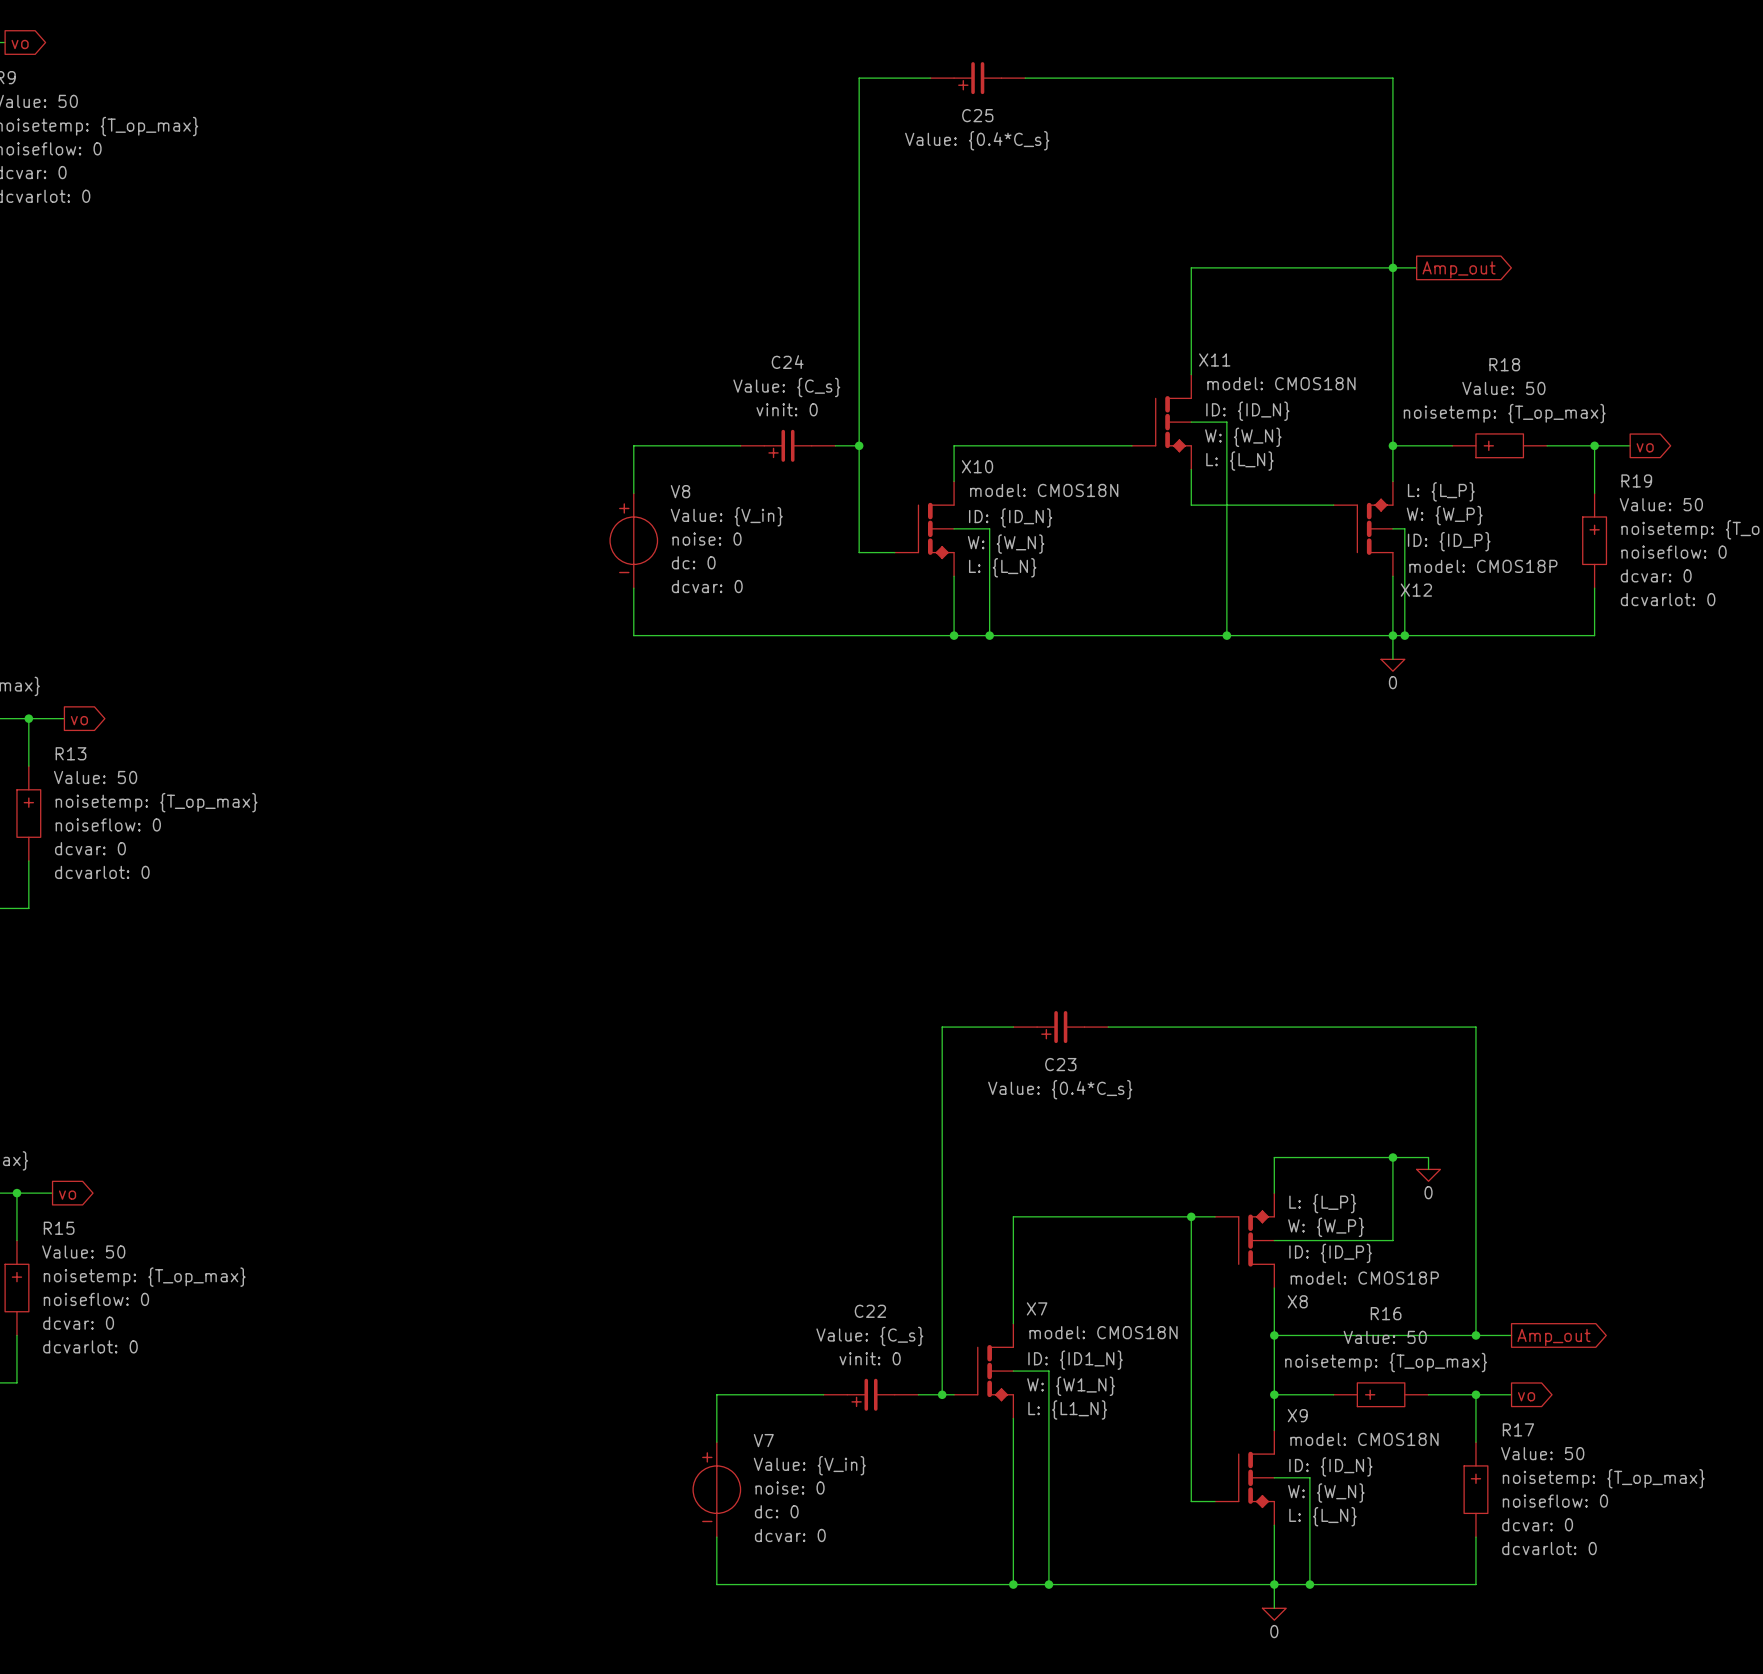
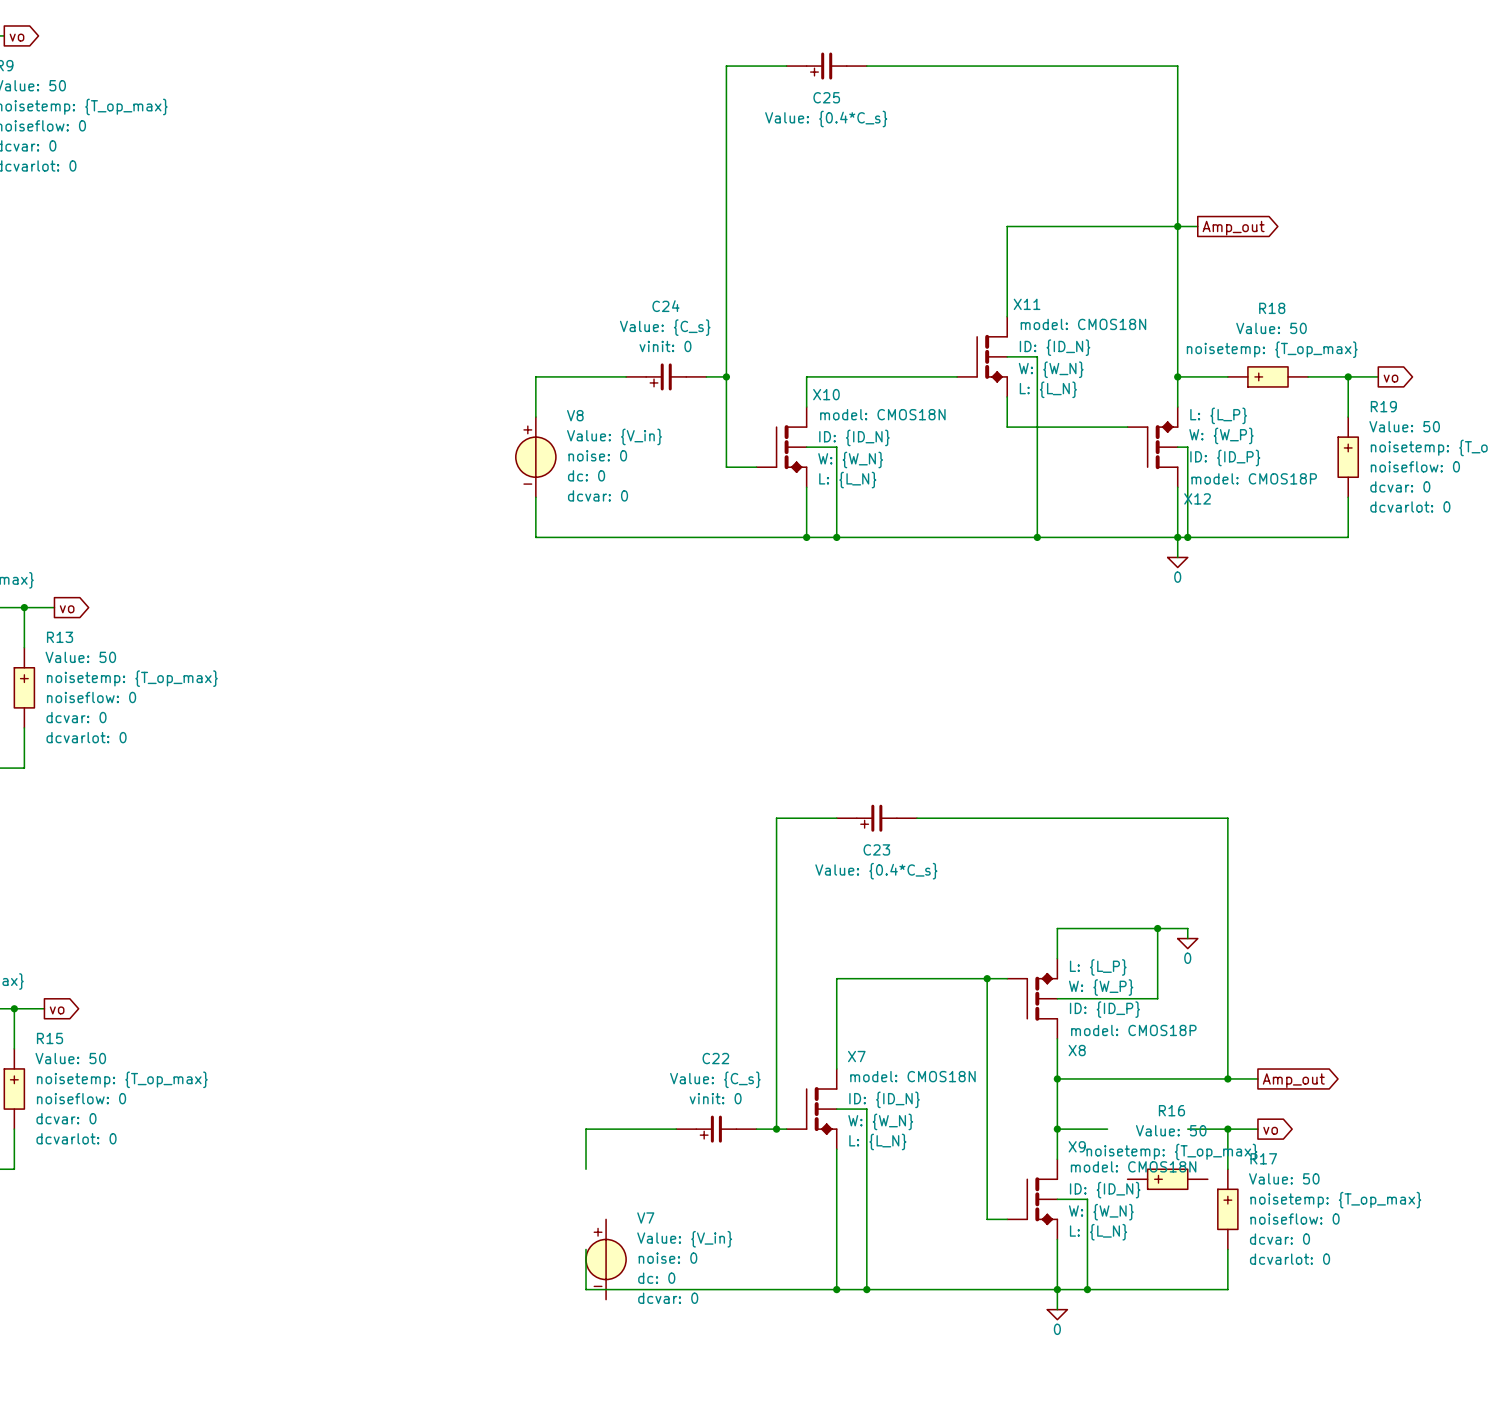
wire: (1013, 1027) (942, 1027) (942, 1394) -> (836, 818) (776, 818) (776, 1129)
C23 position: (1060, 1027) -> (876, 818)
wire: (1108, 1027) (1475, 1027) (1475, 1335) -> (916, 818) (1227, 818) (1227, 1078)
junction: none -> (1157, 928)
junction: none -> (987, 978)
wire: (1392, 1157) (1392, 1240) (1274, 1240) -> (1157, 928) (1157, 998) (1057, 998)
junction: (1392, 1157) -> none
wire: (1428, 1169) (1428, 1157) (1274, 1157) (1274, 1193) -> (1187, 938) (1187, 928) (1057, 928) (1057, 958)
power symbol position: 0 (1428, 1175) -> 0 (1187, 943)
wire: (1191, 1216) (1191, 1501) (1215, 1501) -> (987, 978) (987, 1219) (1007, 1219)
junction: (1191, 1216) -> none
wire: (1215, 1216) (1013, 1216) (1013, 1323) -> (1007, 978) (836, 978) (836, 1068)
X8 position: (1244, 1240) -> (1032, 998)
wire: none -> (1057, 1078) (1257, 1078)
junction: none -> (1057, 1078)
junction: none -> (1227, 1078)
wire: (1274, 1288) (1274, 1430) -> (1057, 1038) (1057, 1159)
junction: none -> (776, 1129)
wire: none -> (1057, 1129) (1077, 1129)
junction position: (1274, 1335) -> (1057, 1129)
wire: (1309, 1335) (1404, 1335) -> none
junction position: (1475, 1335) -> (1227, 1129)
wire: (1487, 1335) (1511, 1335) -> none
global label position: Amp_out (1553, 1337) -> Amp_out (1293, 1080)
X7 text: ID: {ID1_N} (1075, 1360) -> ID: {ID_N} (884, 1099)
X7 position: (983, 1371) -> (811, 1109)
wire: (1013, 1371) (1048, 1371) (1048, 1584) -> (836, 1109) (866, 1109) (866, 1289)
X7 text: W: {W1_N} (1071, 1386) -> W: {W_N} (880, 1121)
wire: (823, 1394) (716, 1394) (716, 1442) -> (676, 1129) (586, 1129) (586, 1169)
C22 position: (871, 1394) -> (716, 1129)
wire: (918, 1394) (954, 1394) -> (756, 1129) (786, 1129)
junction: (942, 1394) -> none
wire: (1274, 1394) (1333, 1394) -> none
junction: (1274, 1394) -> none
wire: (1428, 1394) (1511, 1394) -> none
wire: (1475, 1394) (1475, 1442) -> (1227, 1129) (1227, 1169)
junction: (1475, 1394) -> none
global label position: vo (1526, 1396) -> vo (1270, 1130)
X7 text: L: {L1_N} (1067, 1409) -> L: {L_N} (877, 1141)
wire: (1013, 1418) (1013, 1584) -> (836, 1149) (836, 1289)
X9 position: (1244, 1477) -> (1032, 1199)
wire: (1274, 1477) (1309, 1477) (1309, 1584) -> (1057, 1199) (1087, 1199) (1087, 1289)
R17 position: (1475, 1489) -> (1227, 1209)
junction: none -> (836, 1289)
junction: none -> (866, 1289)
junction: none -> (1057, 1289)
wire: (1274, 1525) (1274, 1608) -> (1057, 1239) (1057, 1309)
junction: none -> (1087, 1289)
wire: (716, 1537) (716, 1584) (1475, 1584) (1475, 1537) -> (586, 1249) (586, 1289) (1227, 1289) (1227, 1249)
junction: (1013, 1584) -> none
junction: (1048, 1584) -> none
junction: (1274, 1584) -> none
junction: (1309, 1584) -> none
power symbol position: 0 (1274, 1614) -> 0 (1057, 1314)

